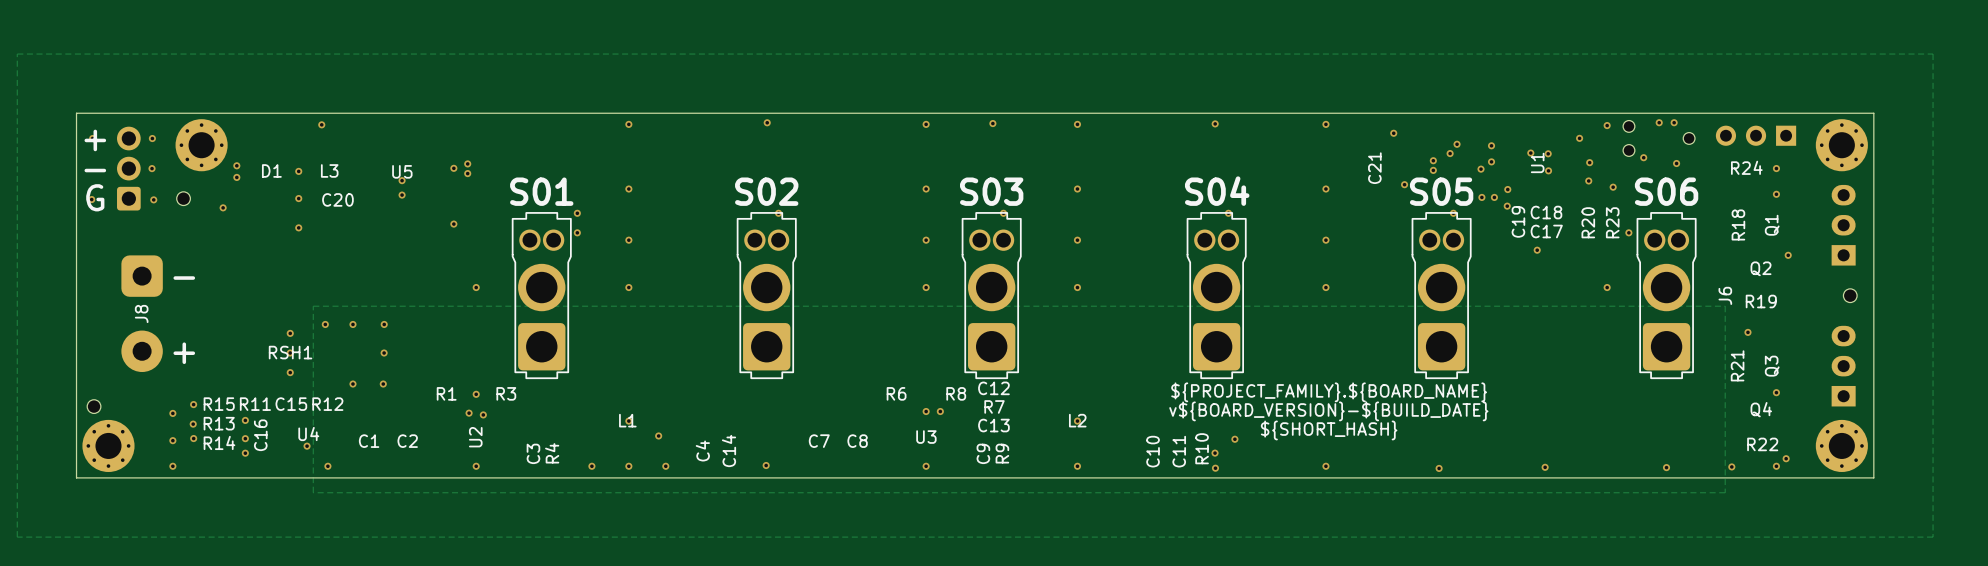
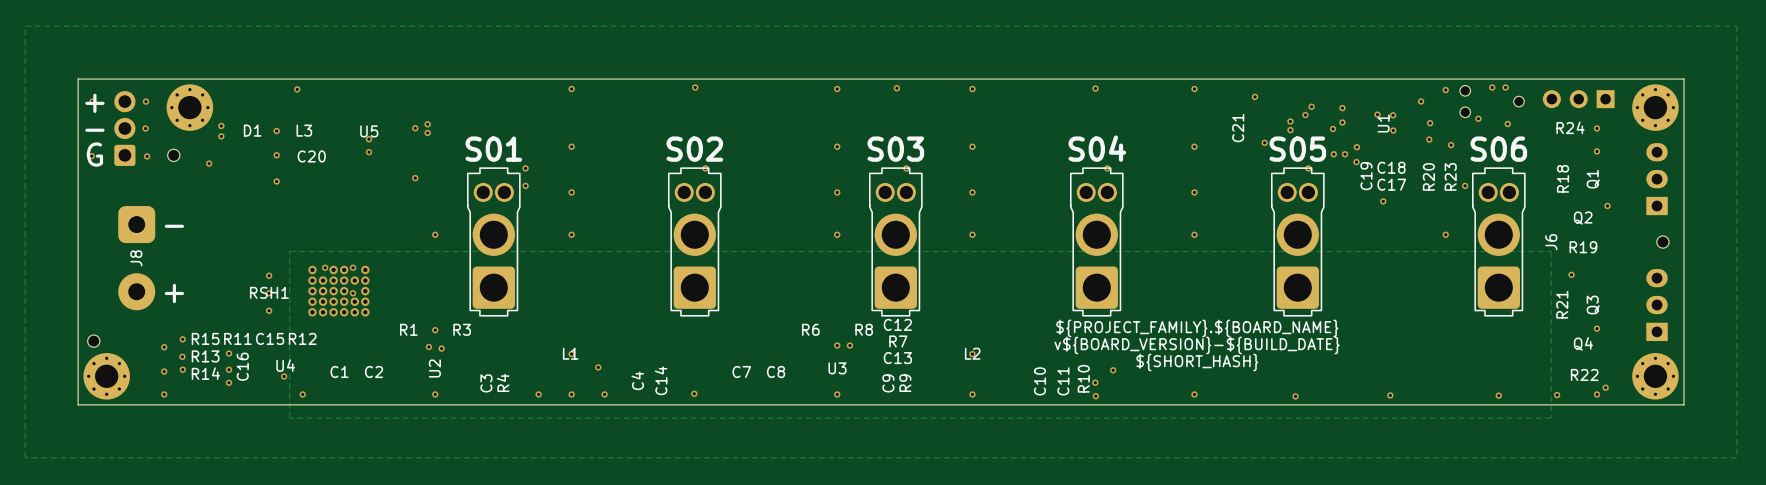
via: (325, 324) -> none
via: none -> (312, 269)
via: none -> (333, 269)
via: none -> (344, 269)
via: none -> (365, 269)
via: none -> (312, 280)
via: none -> (323, 280)
via: none -> (333, 280)
via: none -> (344, 280)
via: none -> (354, 280)
via: none -> (365, 280)
via: none -> (312, 291)
via: none -> (323, 291)
via: none -> (333, 291)
via: none -> (344, 291)
via: none -> (365, 291)
via: none -> (312, 301)
via: none -> (323, 301)
via: none -> (333, 301)
via: none -> (344, 301)
via: none -> (354, 301)
via: none -> (365, 301)
via: none -> (312, 312)
via: none -> (323, 312)
via: none -> (333, 312)
via: none -> (344, 312)
via: none -> (354, 312)
via: none -> (365, 312)
via: (352, 384) -> none
via: (383, 384) -> none

